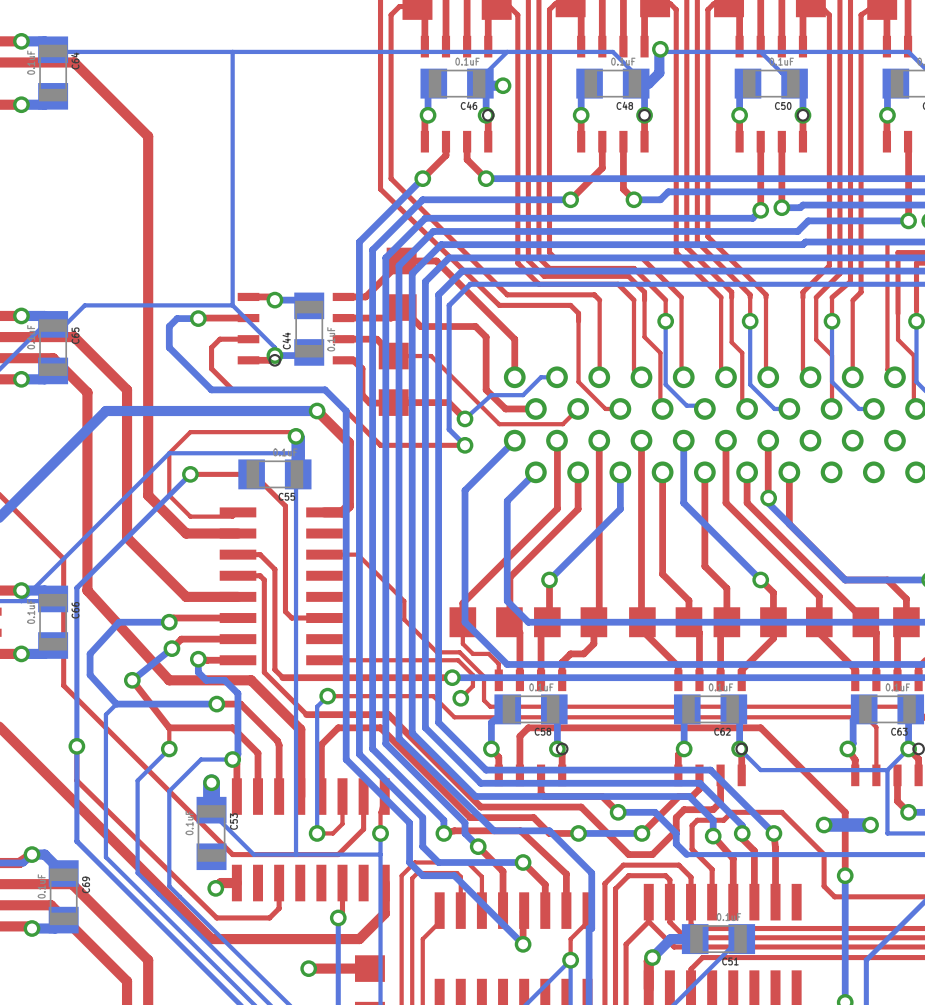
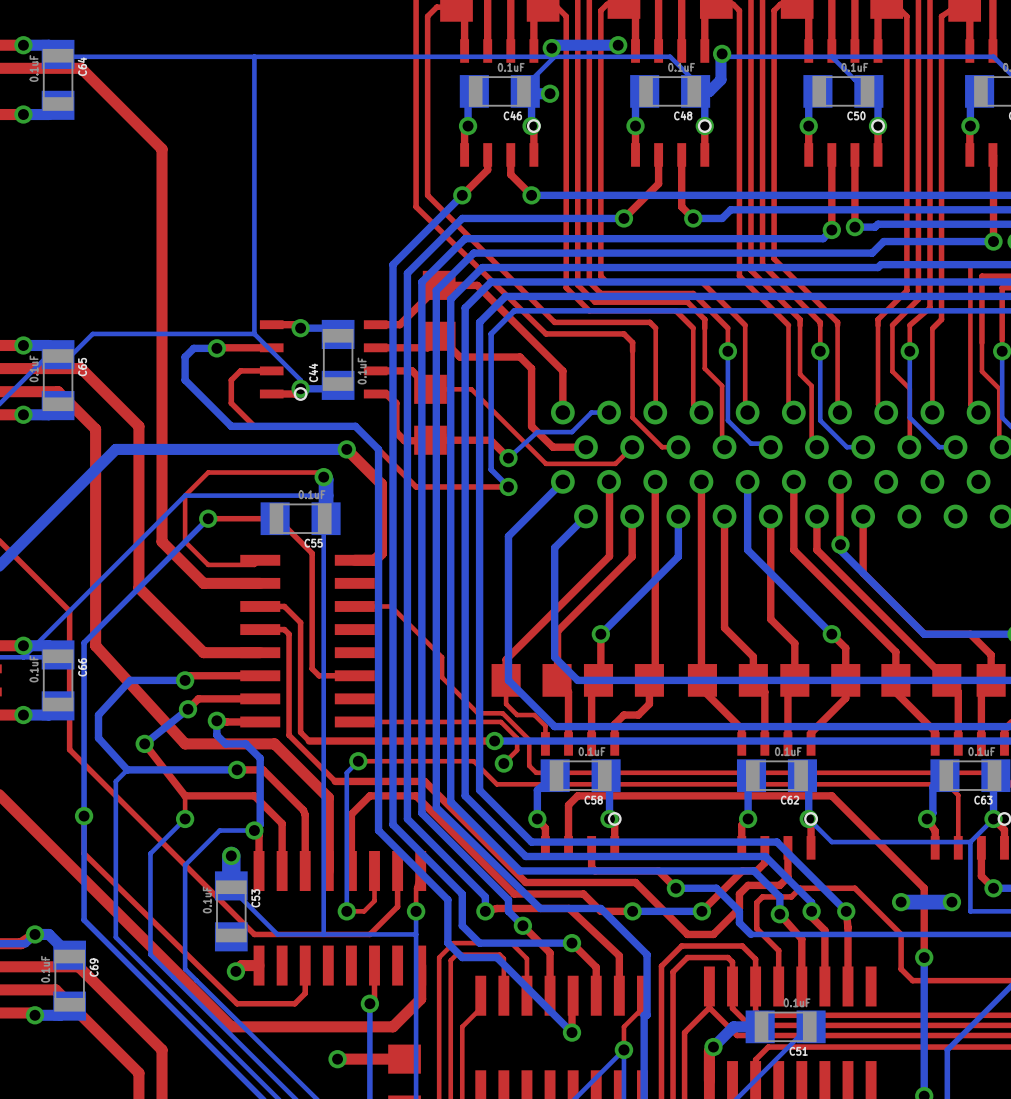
bottom track: none -> (618, 45) (554, 45) (551, 48) (554, 56)
via: none -> (618, 45)
via: none -> (551, 48)

